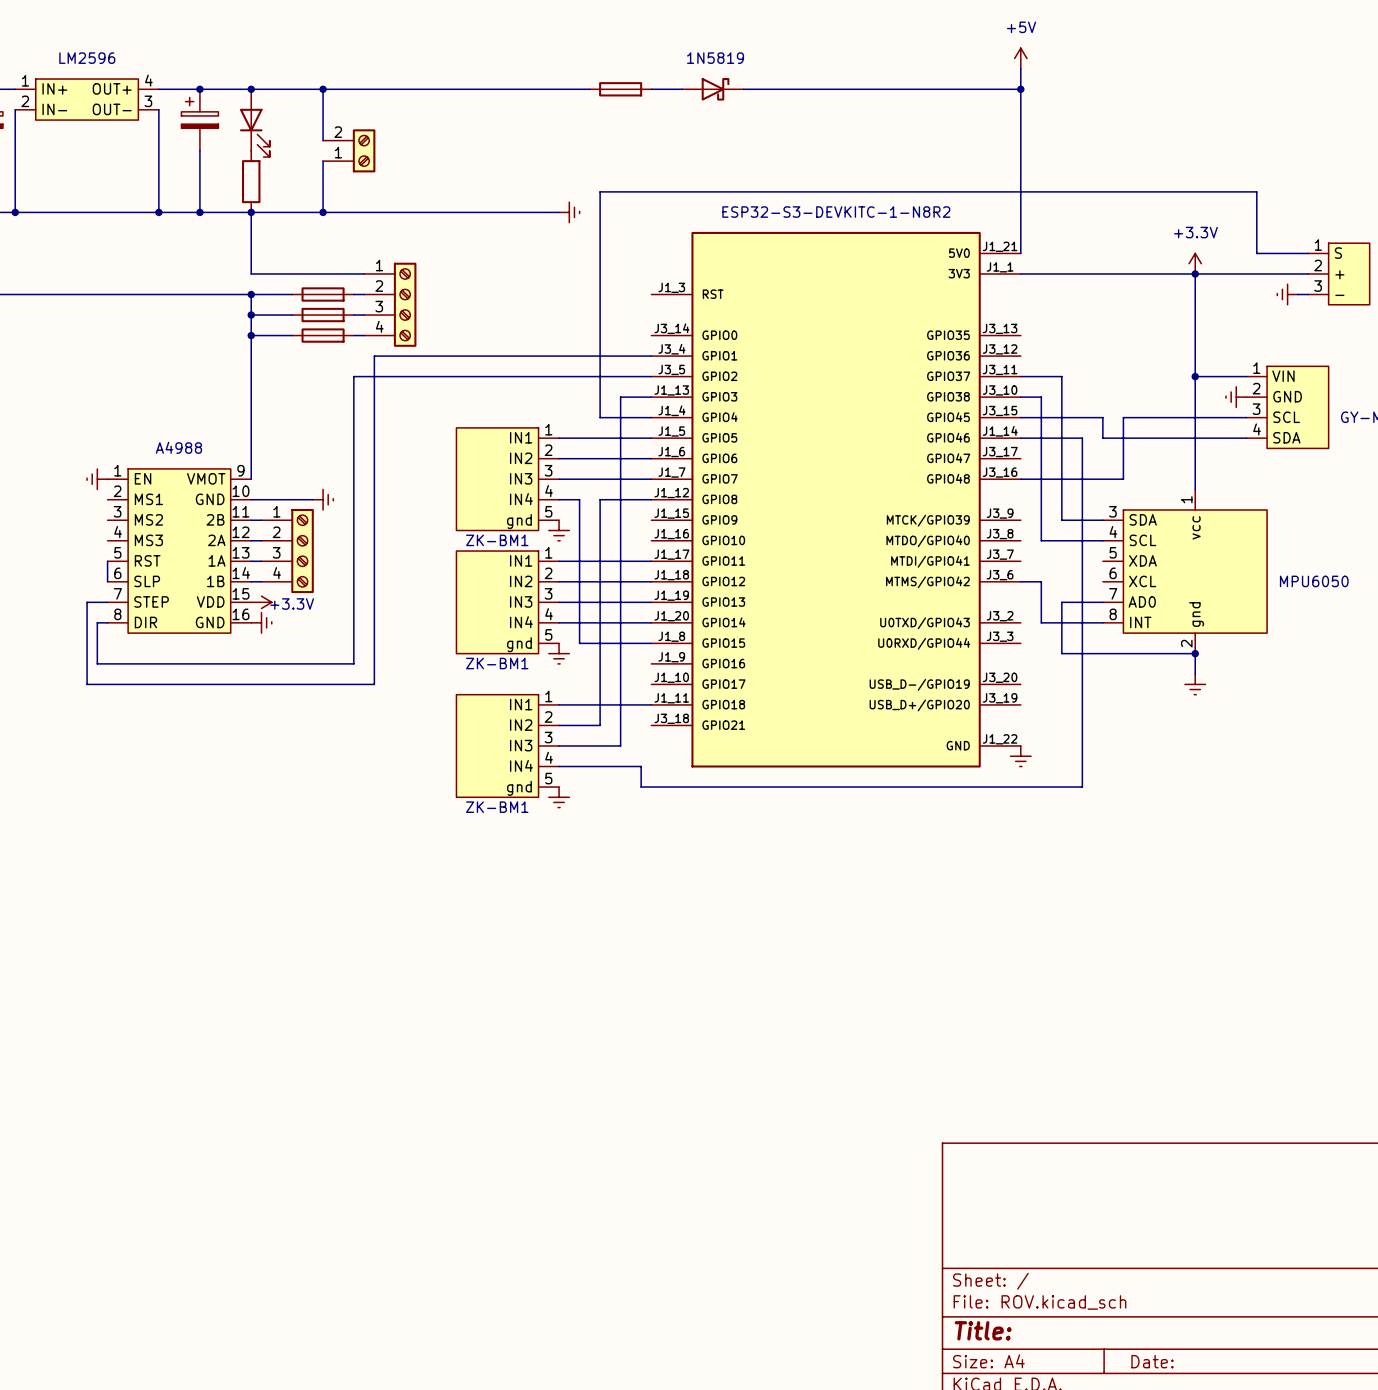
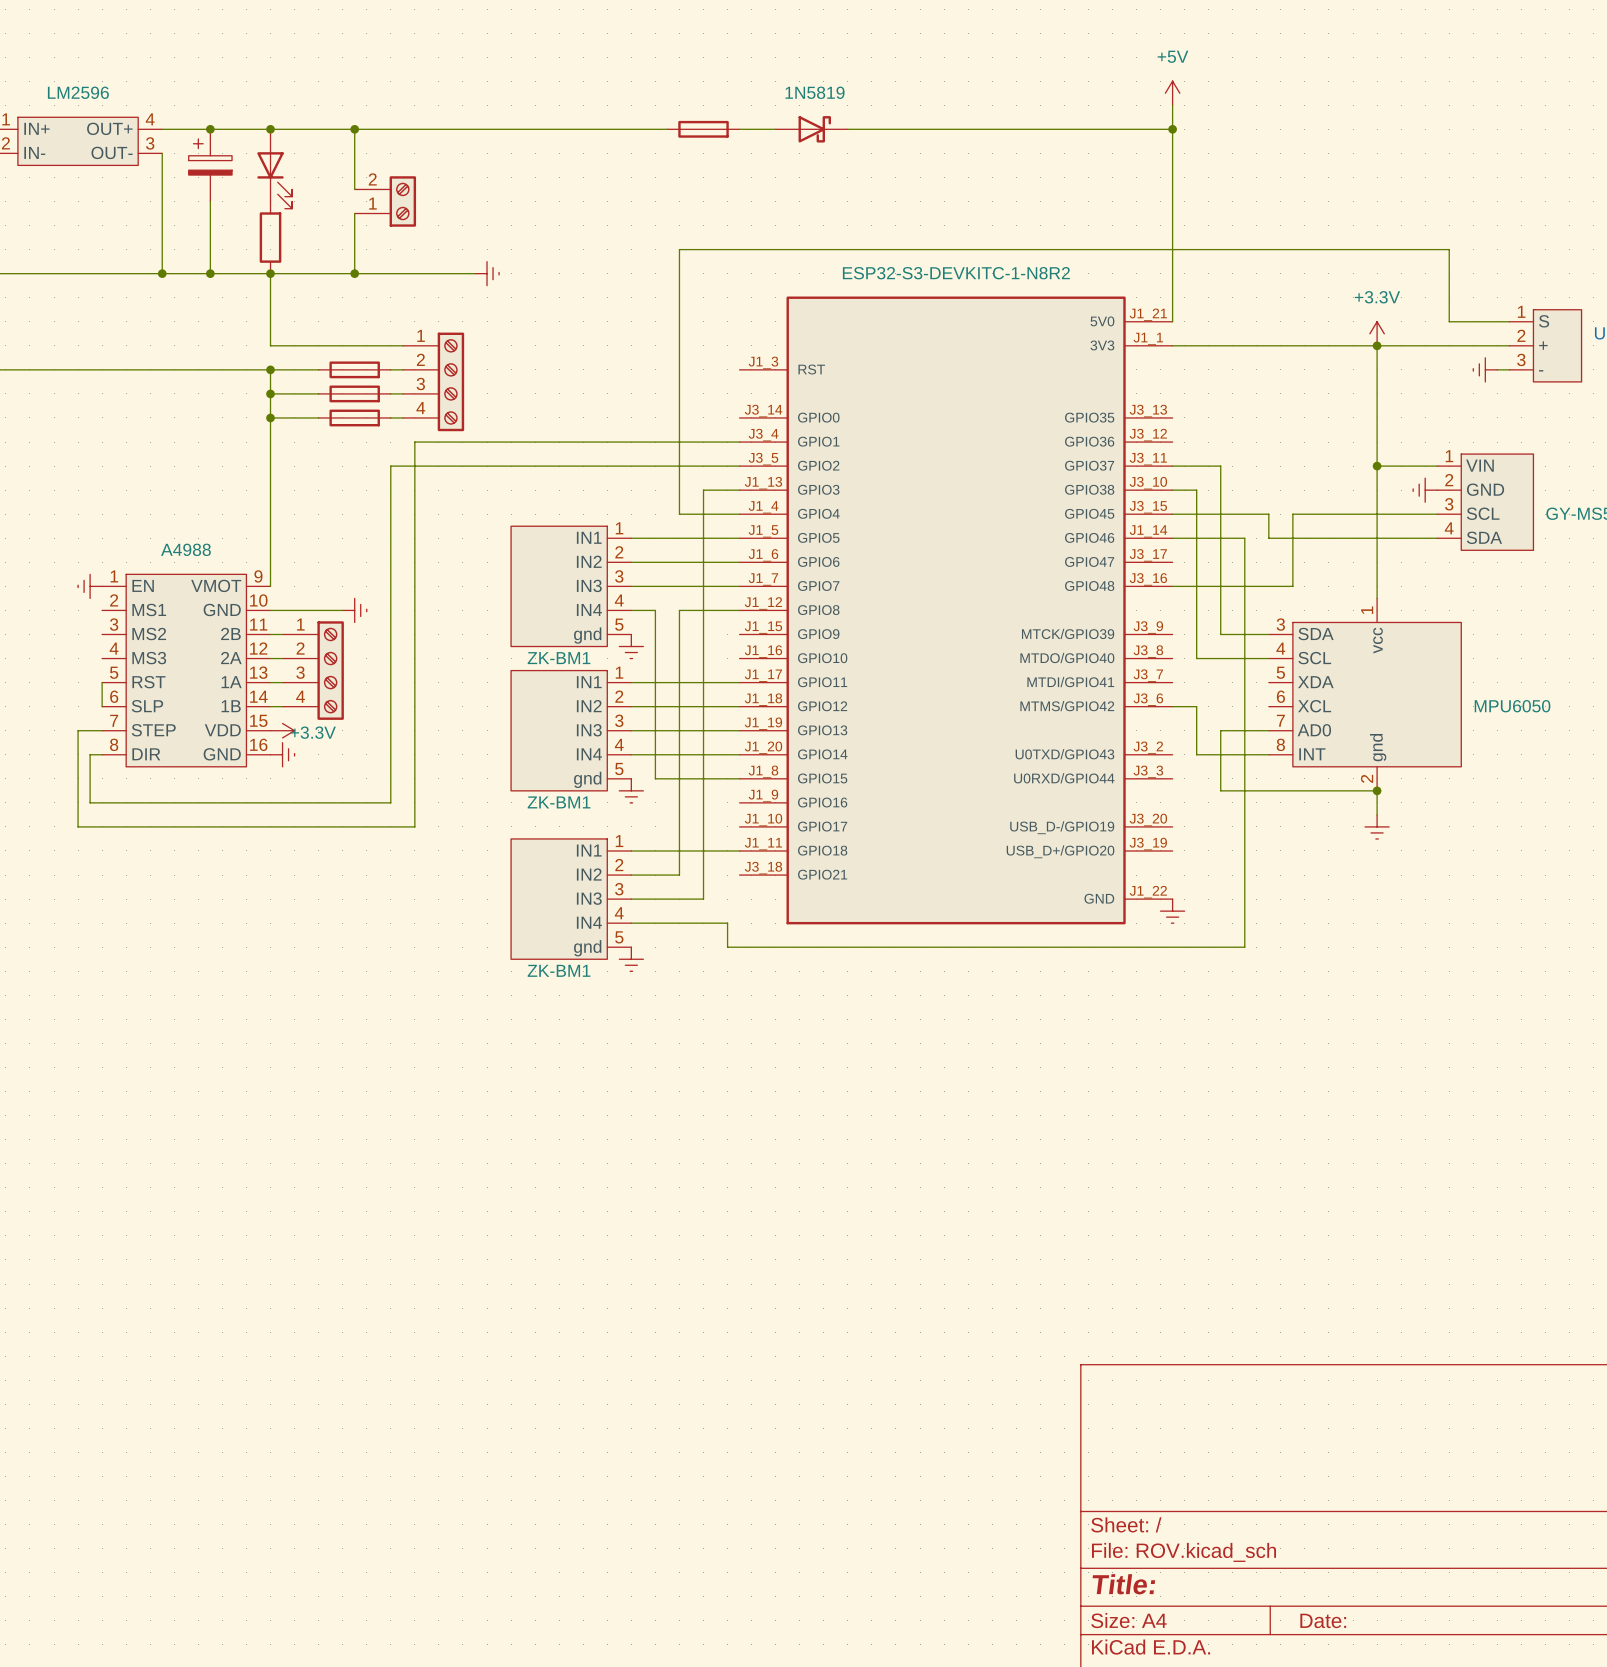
wire: (425, 212) (559, 212) -> none
power symbol position: (569, 212) -> (487, 273)

